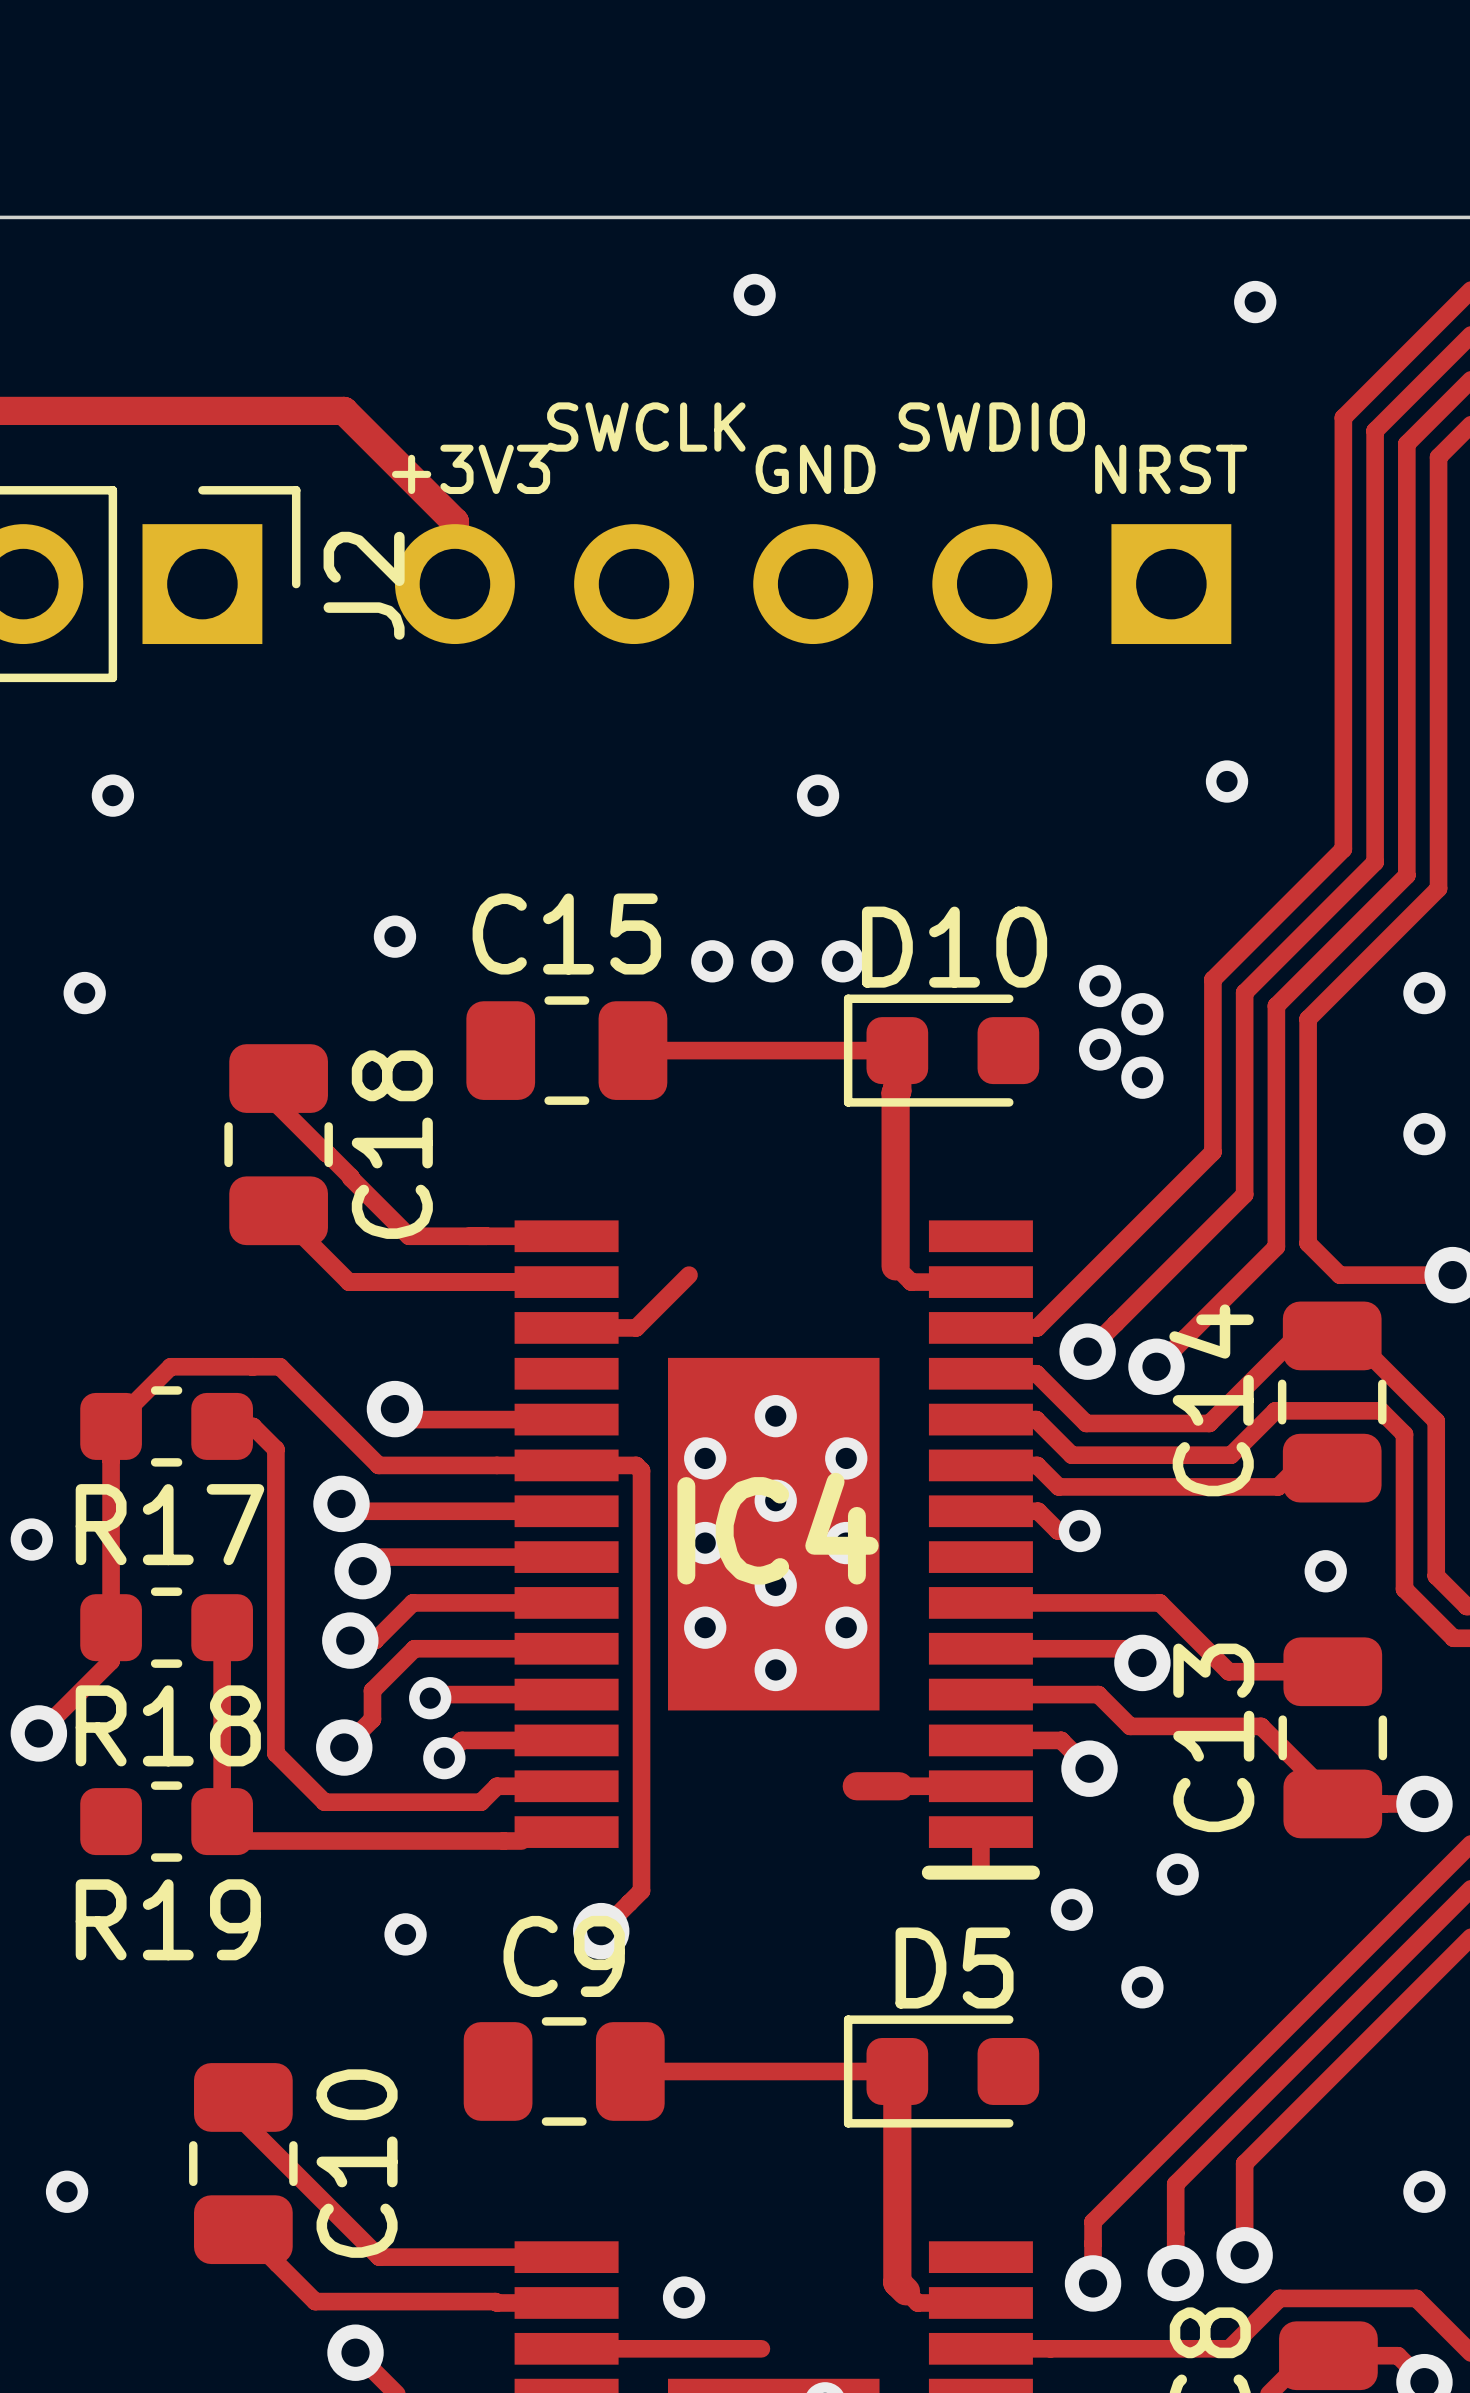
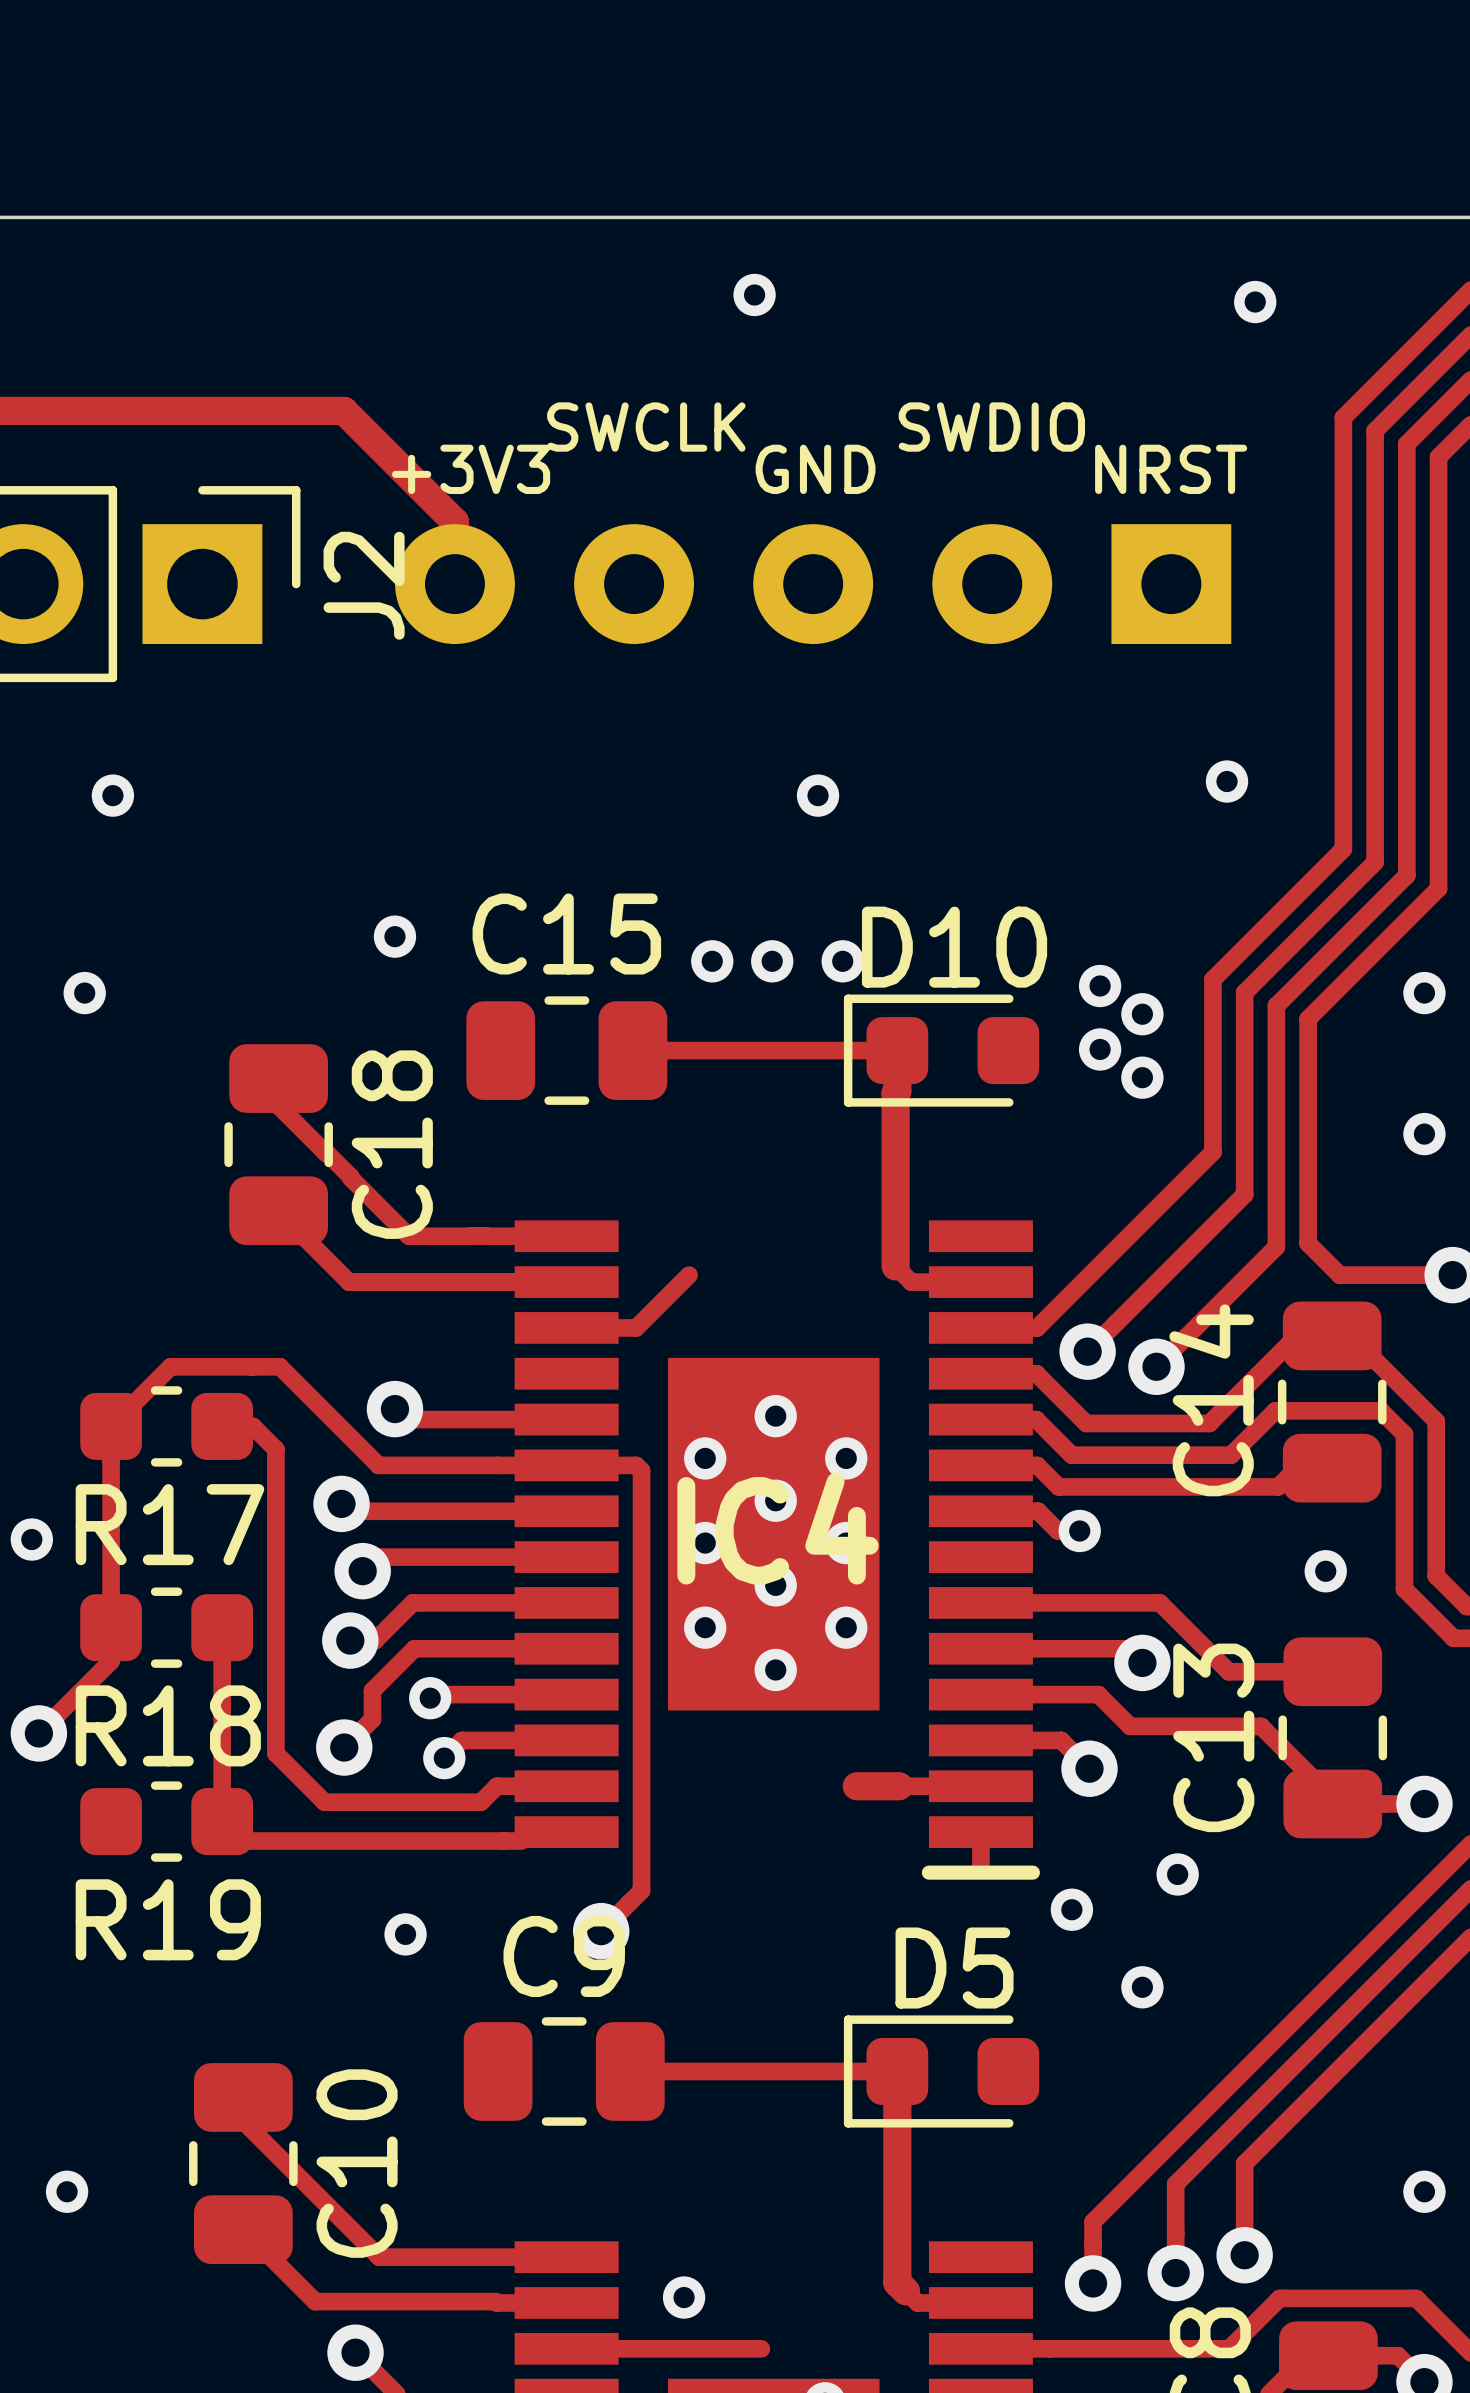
part footprint: [395, 524, 1232, 645] -> [395, 524, 1232, 645]

